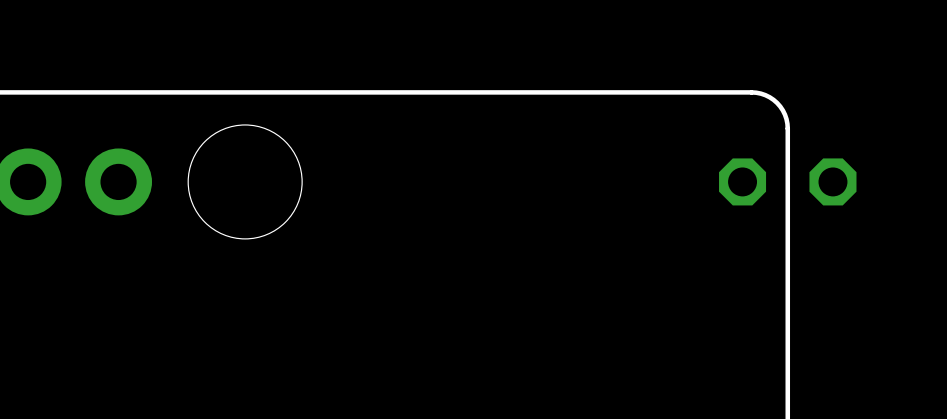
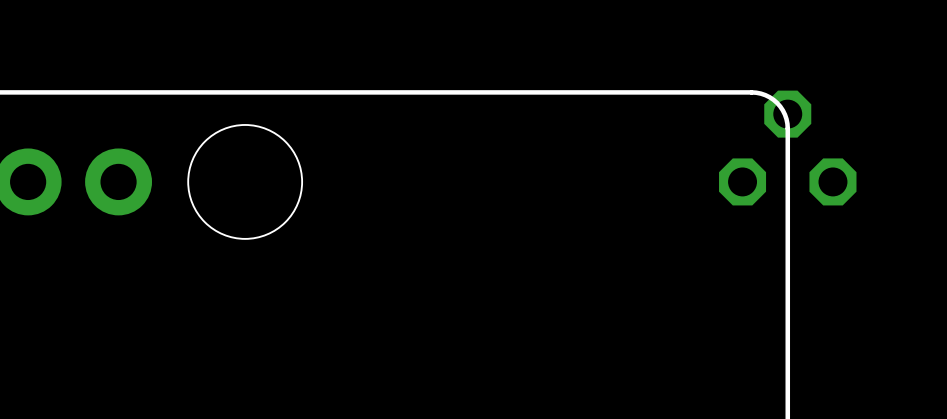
part footprint: [719, 158, 857, 206] -> [719, 90, 857, 206]

